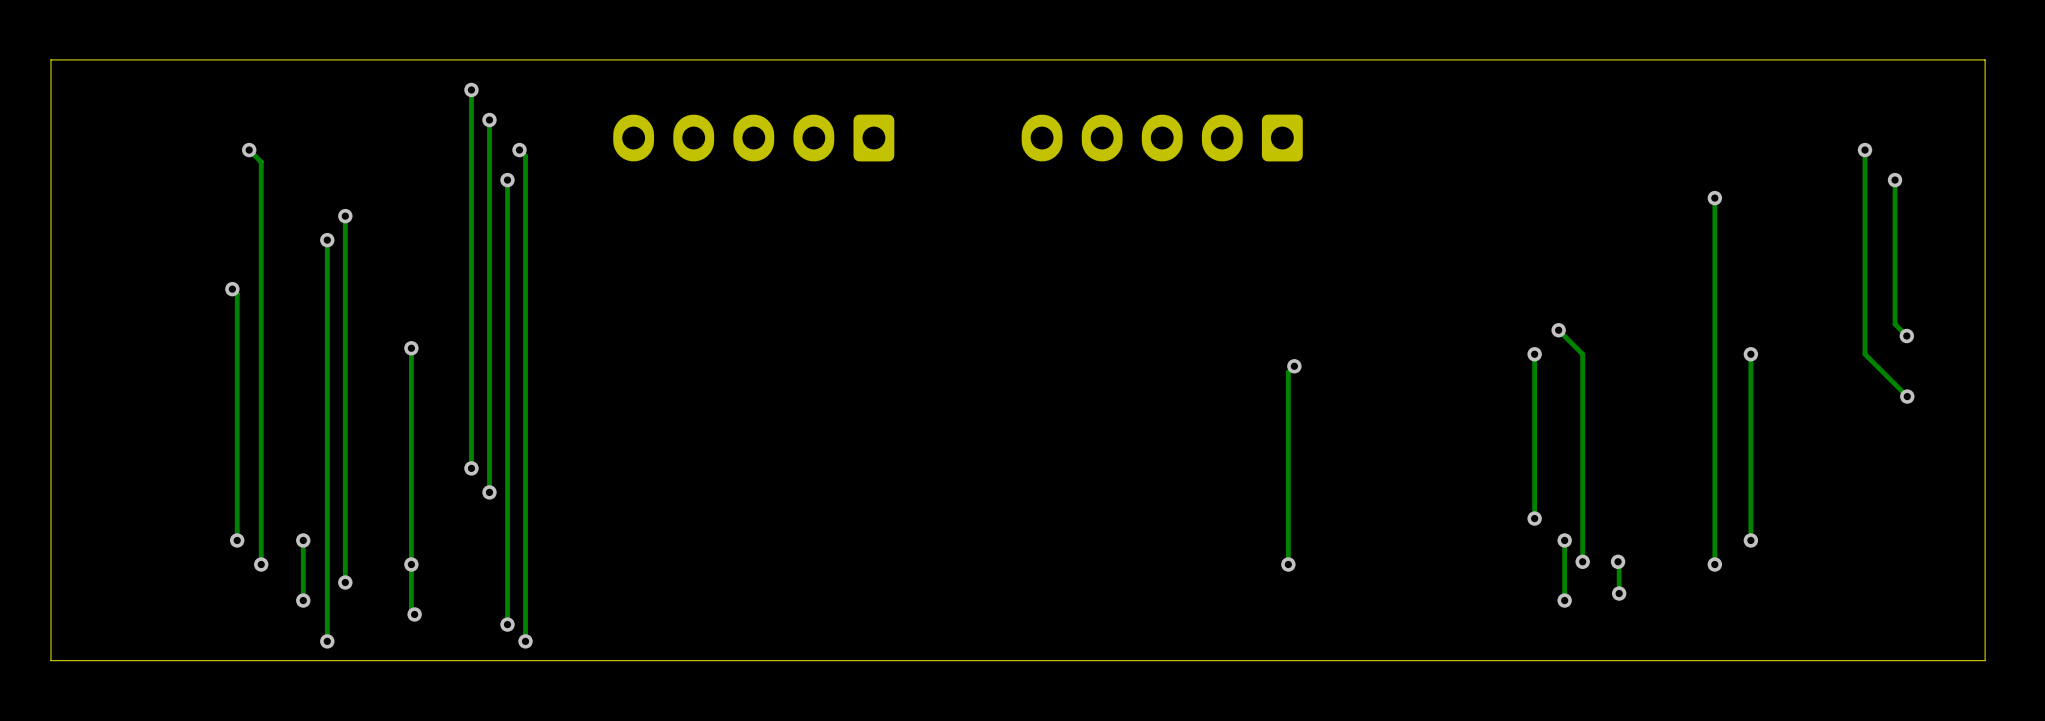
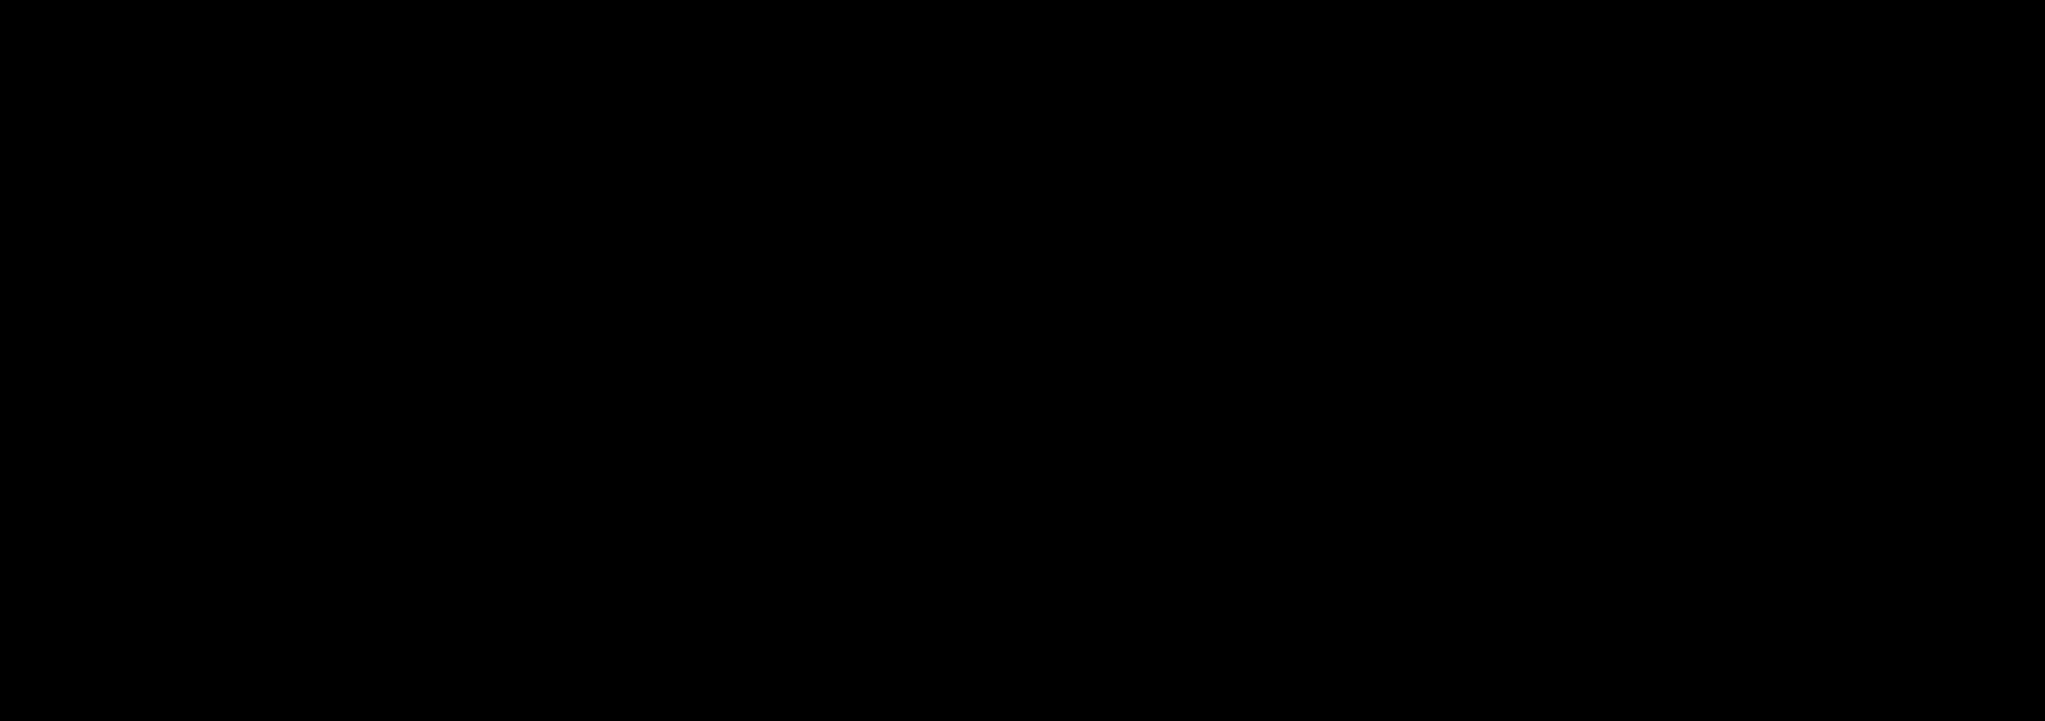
board edge: (1985, 59) (51, 59) (51, 660) (1985, 660) (1985, 59) -> none
track: (471, 89) (471, 468) -> none
via: (471, 89) -> none
track: (489, 120) (489, 492) -> none
via: (489, 120) -> none
part: (753, 138) -> none
part: (1162, 138) -> none
track: (249, 150) (261, 162) (261, 564) -> none
via: (249, 150) -> none
track: (519, 150) (525, 156) (525, 641) -> none
via: (519, 150) -> none
track: (1865, 150) (1865, 354) (1907, 396) -> none
via: (1865, 150) -> none
track: (507, 180) (507, 624) -> none
via: (507, 180) -> none
track: (1895, 180) (1895, 324) (1906, 336) -> none
via: (1895, 180) -> none
track: (1714, 198) (1714, 564) -> none
via: (1714, 198) -> none
track: (345, 216) (345, 582) -> none
via: (345, 216) -> none
track: (327, 240) (327, 641) -> none
via: (327, 240) -> none
track: (232, 289) (237, 293) (237, 540) -> none
via: (232, 289) -> none
track: (1558, 330) (1582, 354) (1582, 561) -> none
via: (1558, 330) -> none
via: (1906, 336) -> none
track: (411, 348) (411, 611) (414, 614) -> none
via: (411, 348) -> none
track: (1534, 354) (1534, 518) -> none
via: (1534, 354) -> none
track: (1750, 354) (1750, 540) -> none
via: (1750, 354) -> none
track: (1294, 366) (1288, 372) (1288, 564) -> none
via: (1294, 366) -> none
via: (1907, 396) -> none
via: (471, 468) -> none
via: (489, 492) -> none
via: (1534, 518) -> none
via: (237, 540) -> none
track: (303, 540) (303, 600) -> none
via: (303, 540) -> none
track: (1564, 540) (1564, 600) -> none
via: (1564, 540) -> none
via: (1750, 540) -> none
via: (1582, 561) -> none
track: (1618, 561) (1619, 593) -> none
via: (1618, 561) -> none
via: (261, 564) -> none
via: (411, 564) -> none
via: (1288, 564) -> none
via: (1714, 564) -> none
via: (345, 582) -> none
via: (1619, 593) -> none
via: (303, 600) -> none
via: (1564, 600) -> none
via: (414, 614) -> none
via: (507, 624) -> none
via: (327, 641) -> none
via: (525, 641) -> none

